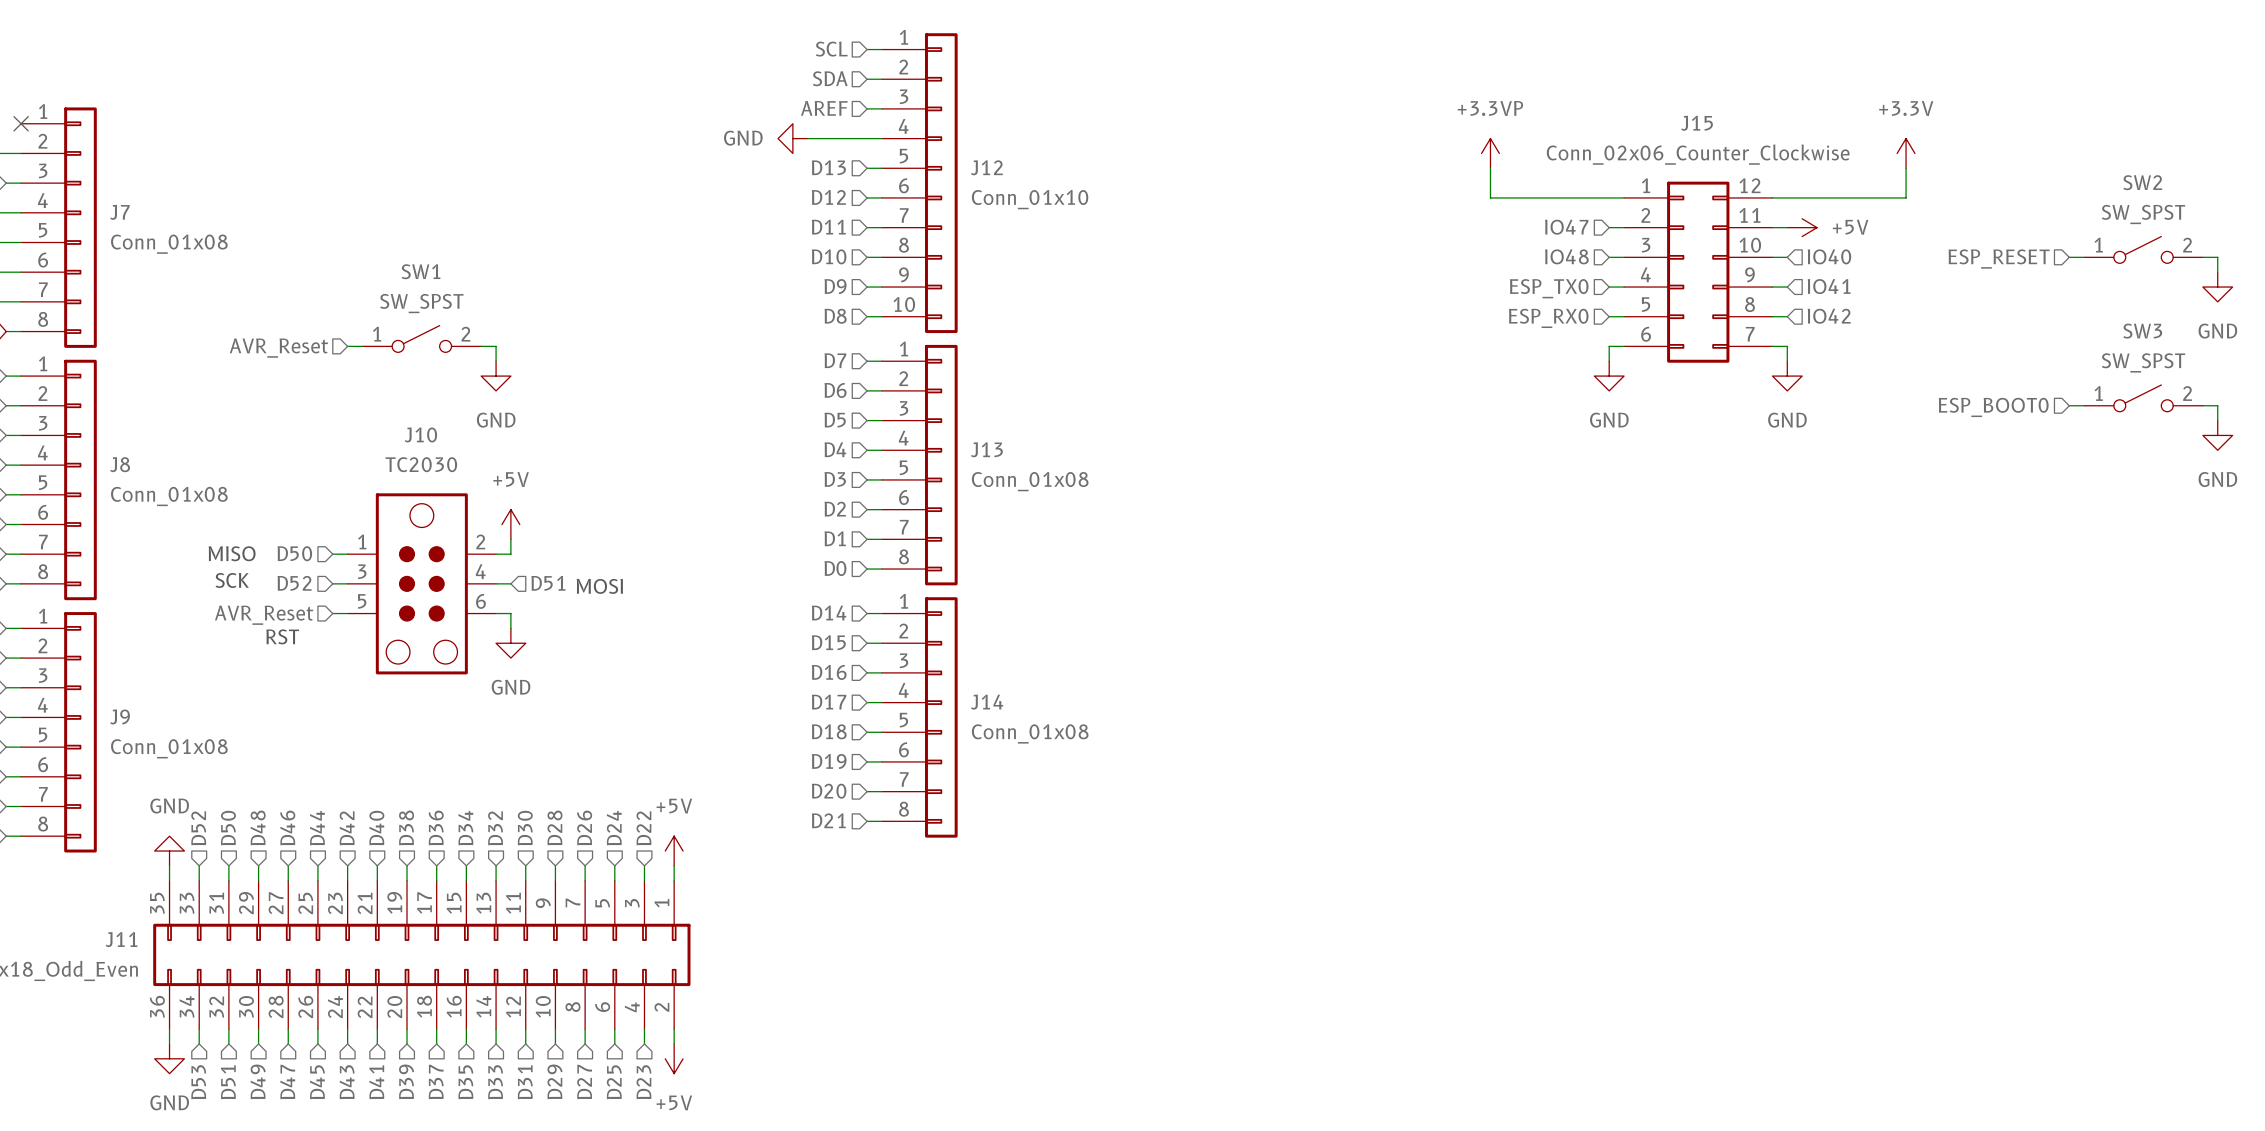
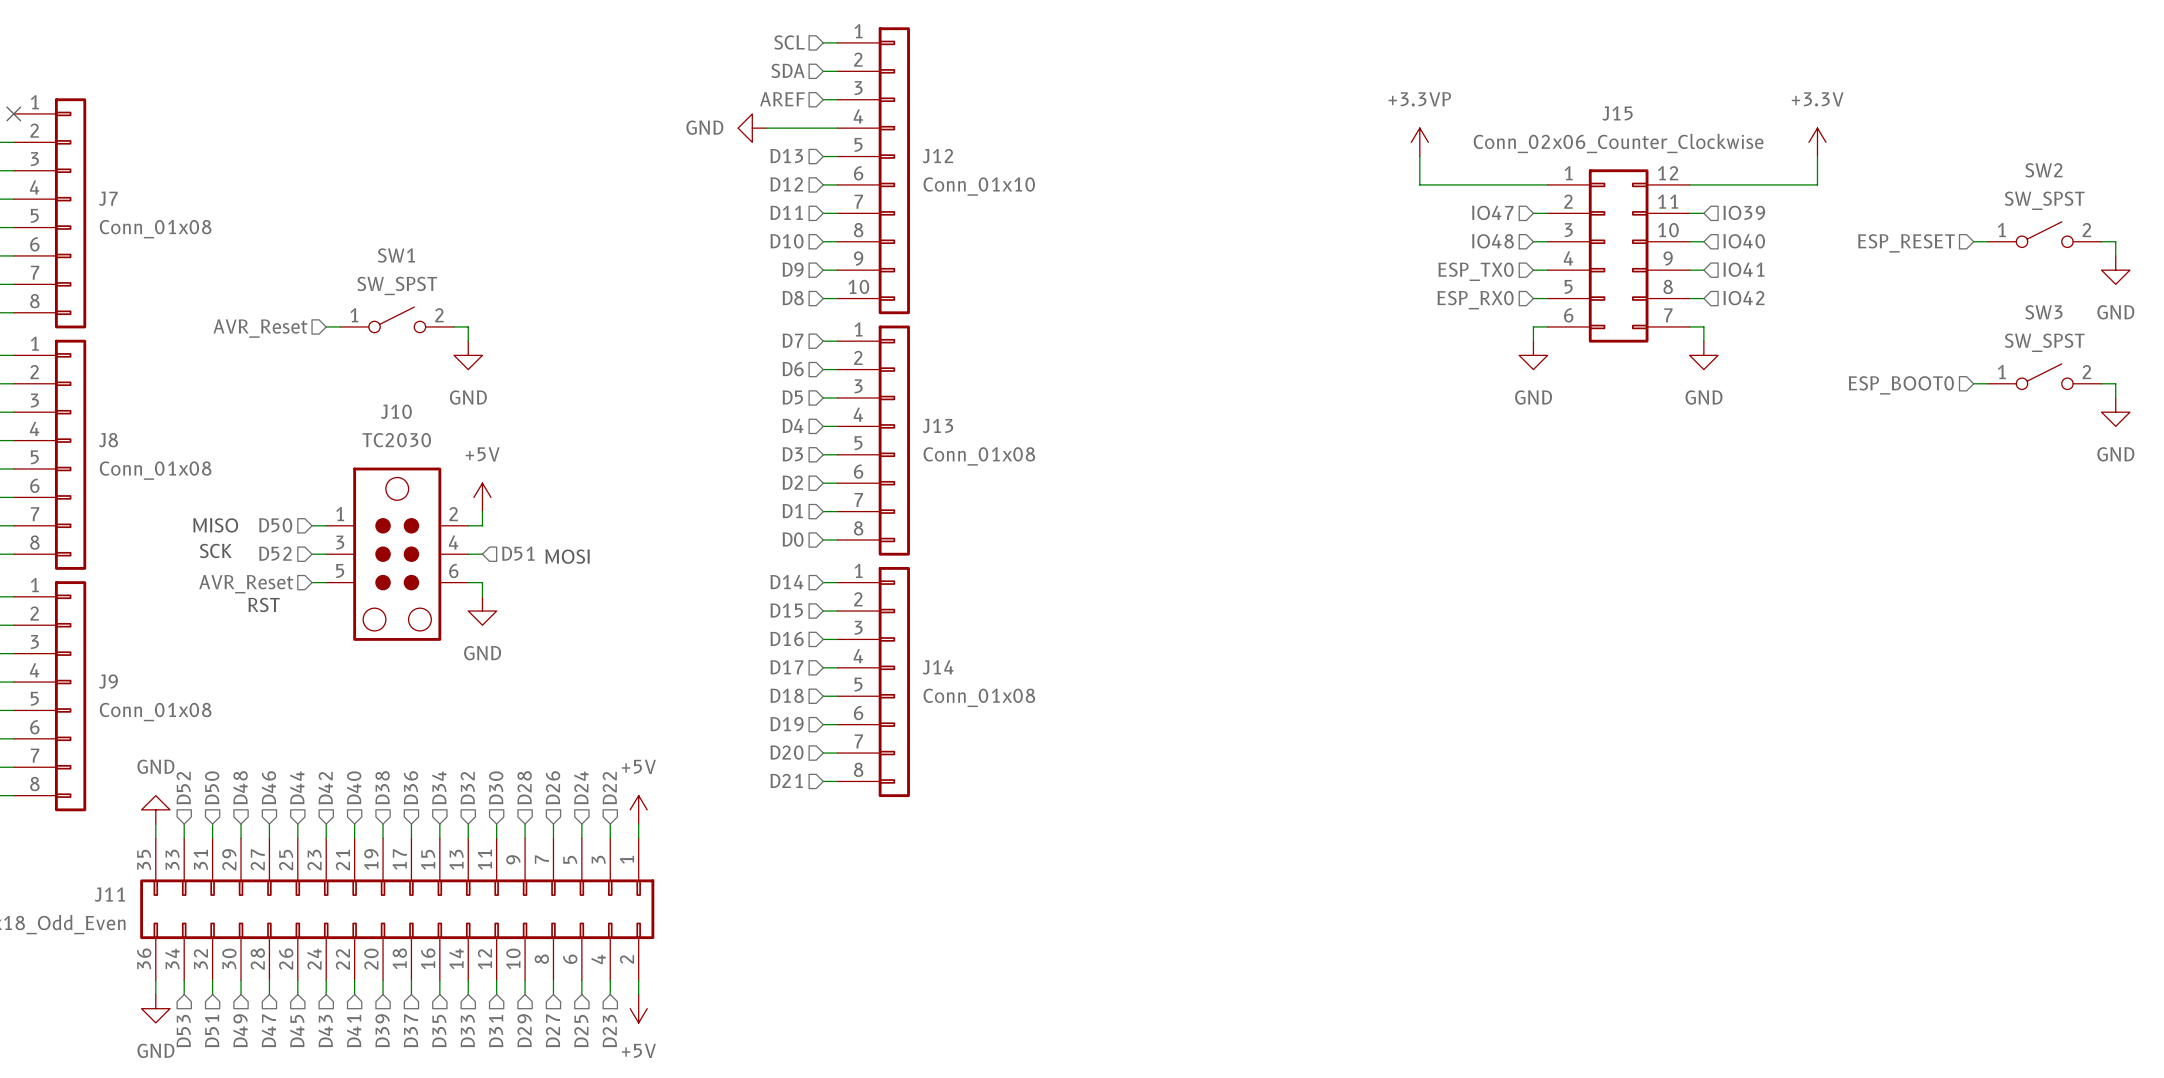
power symbol: +5V (1802, 227) -> none
hierarchical label: none -> IO39 (1744, 212)

